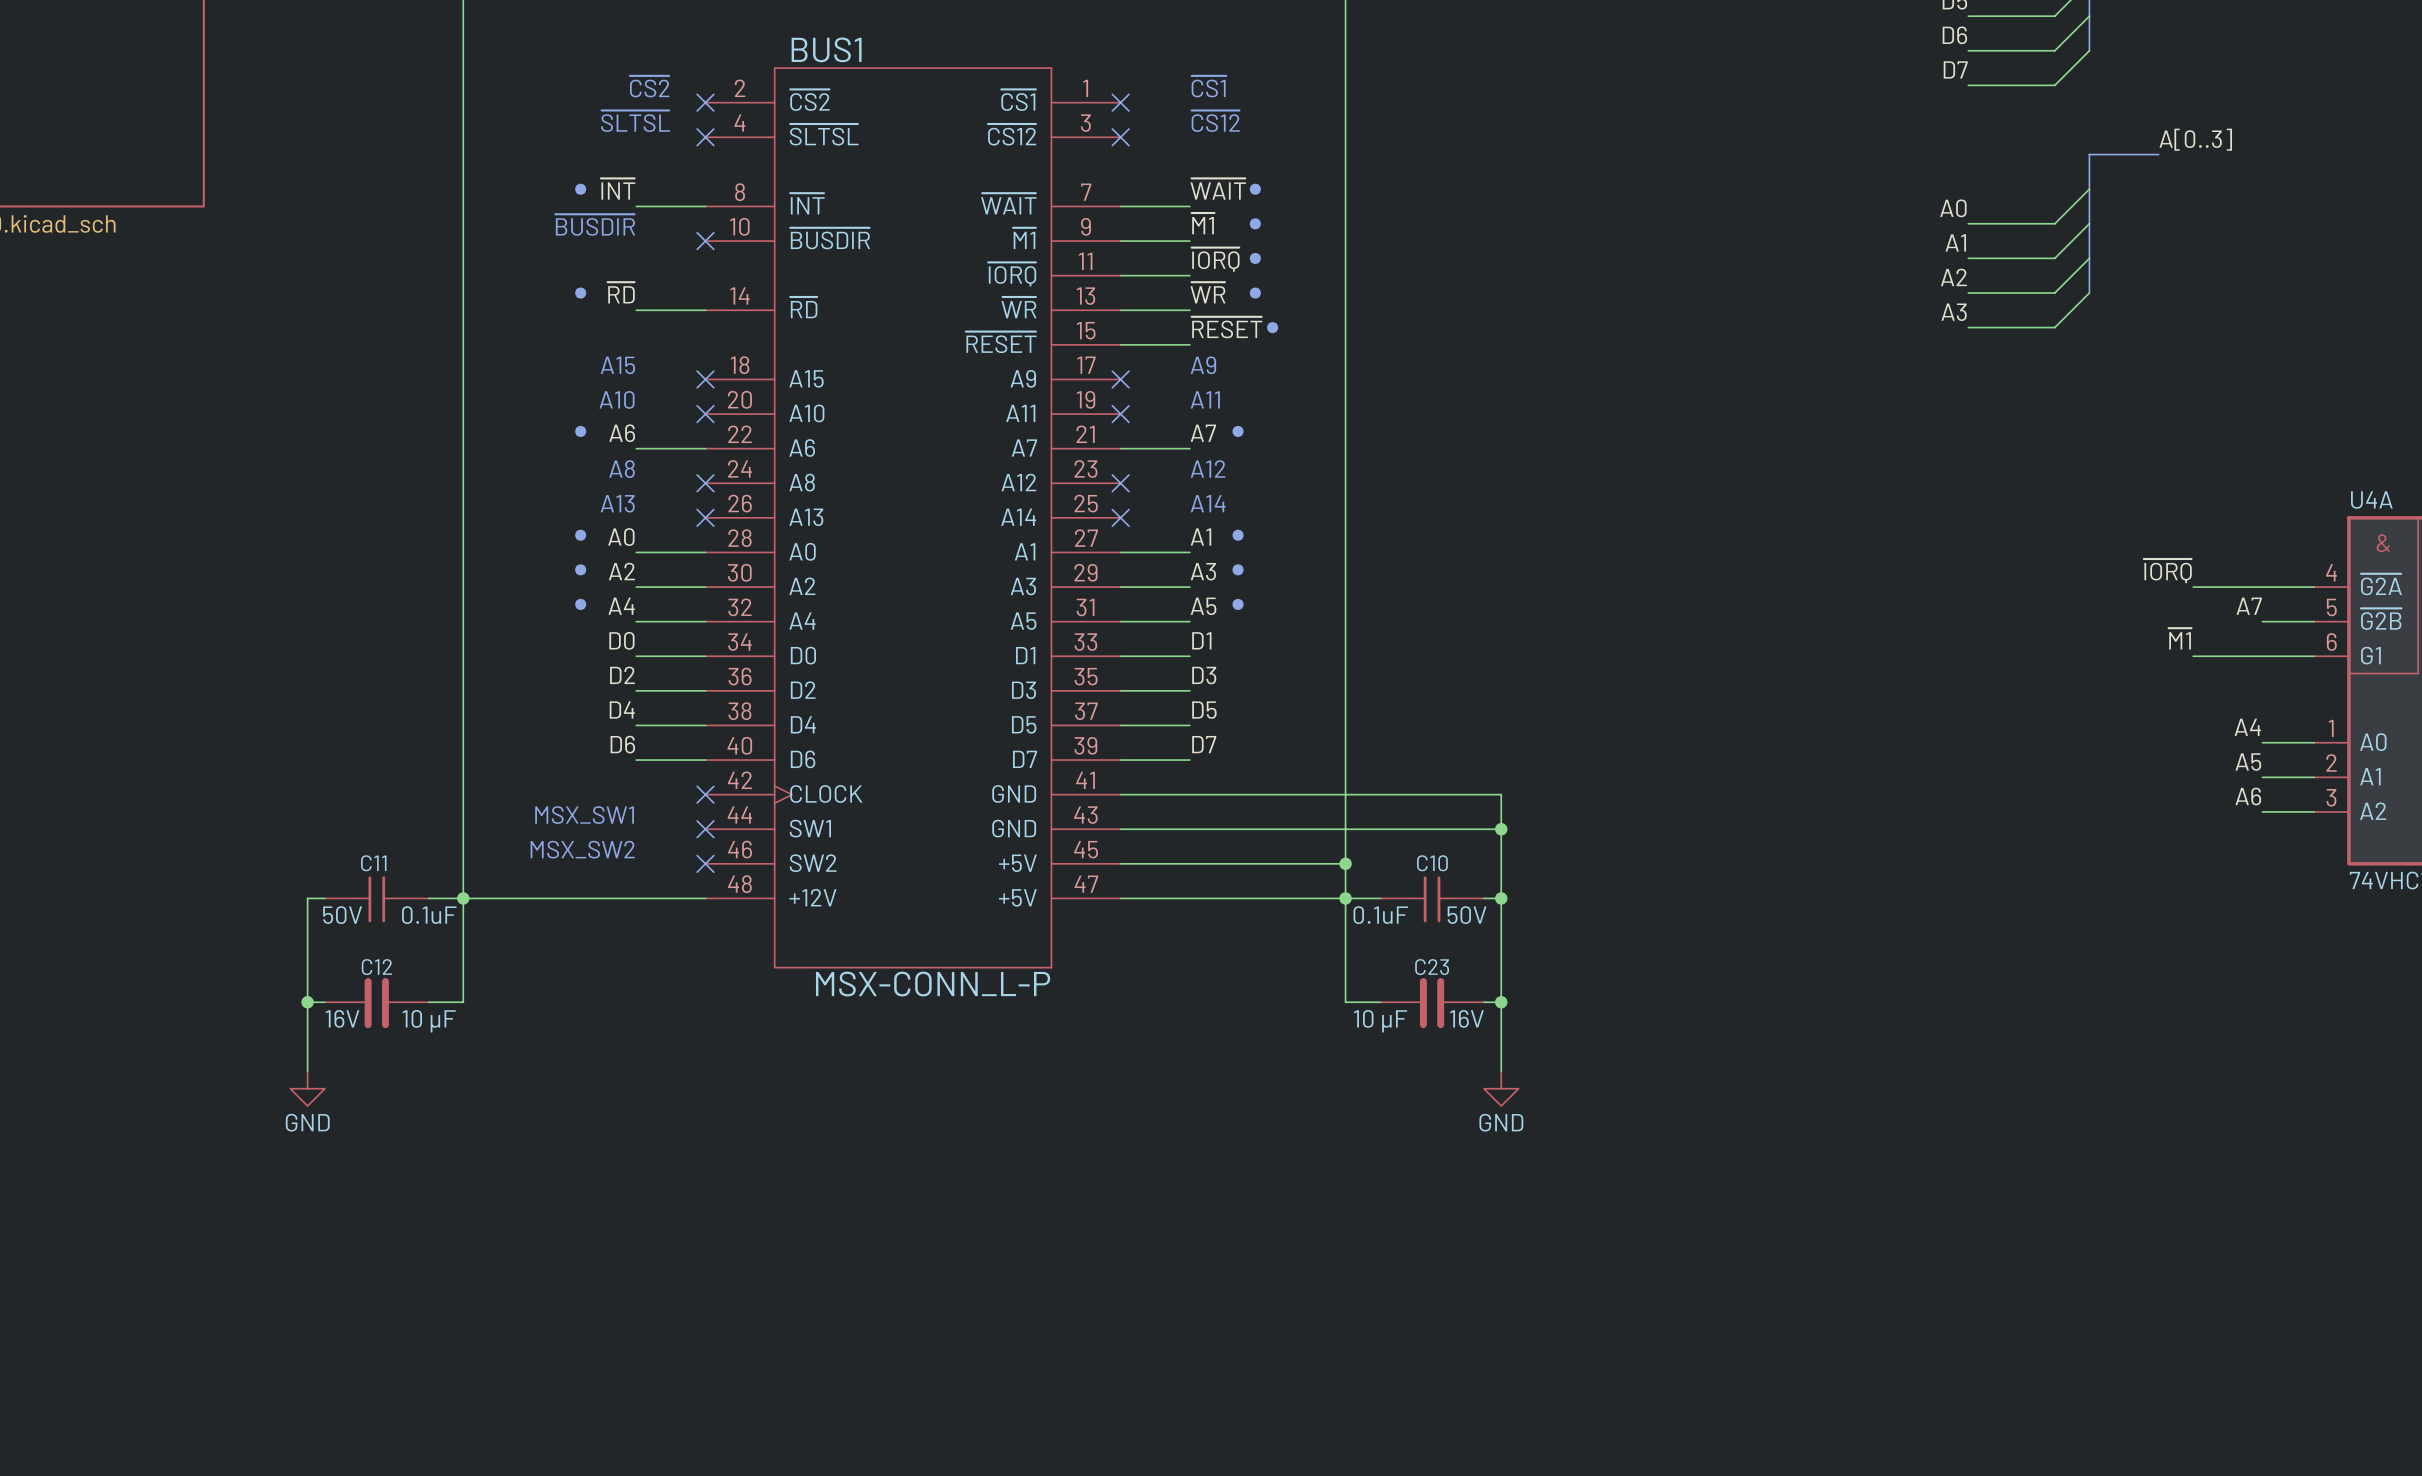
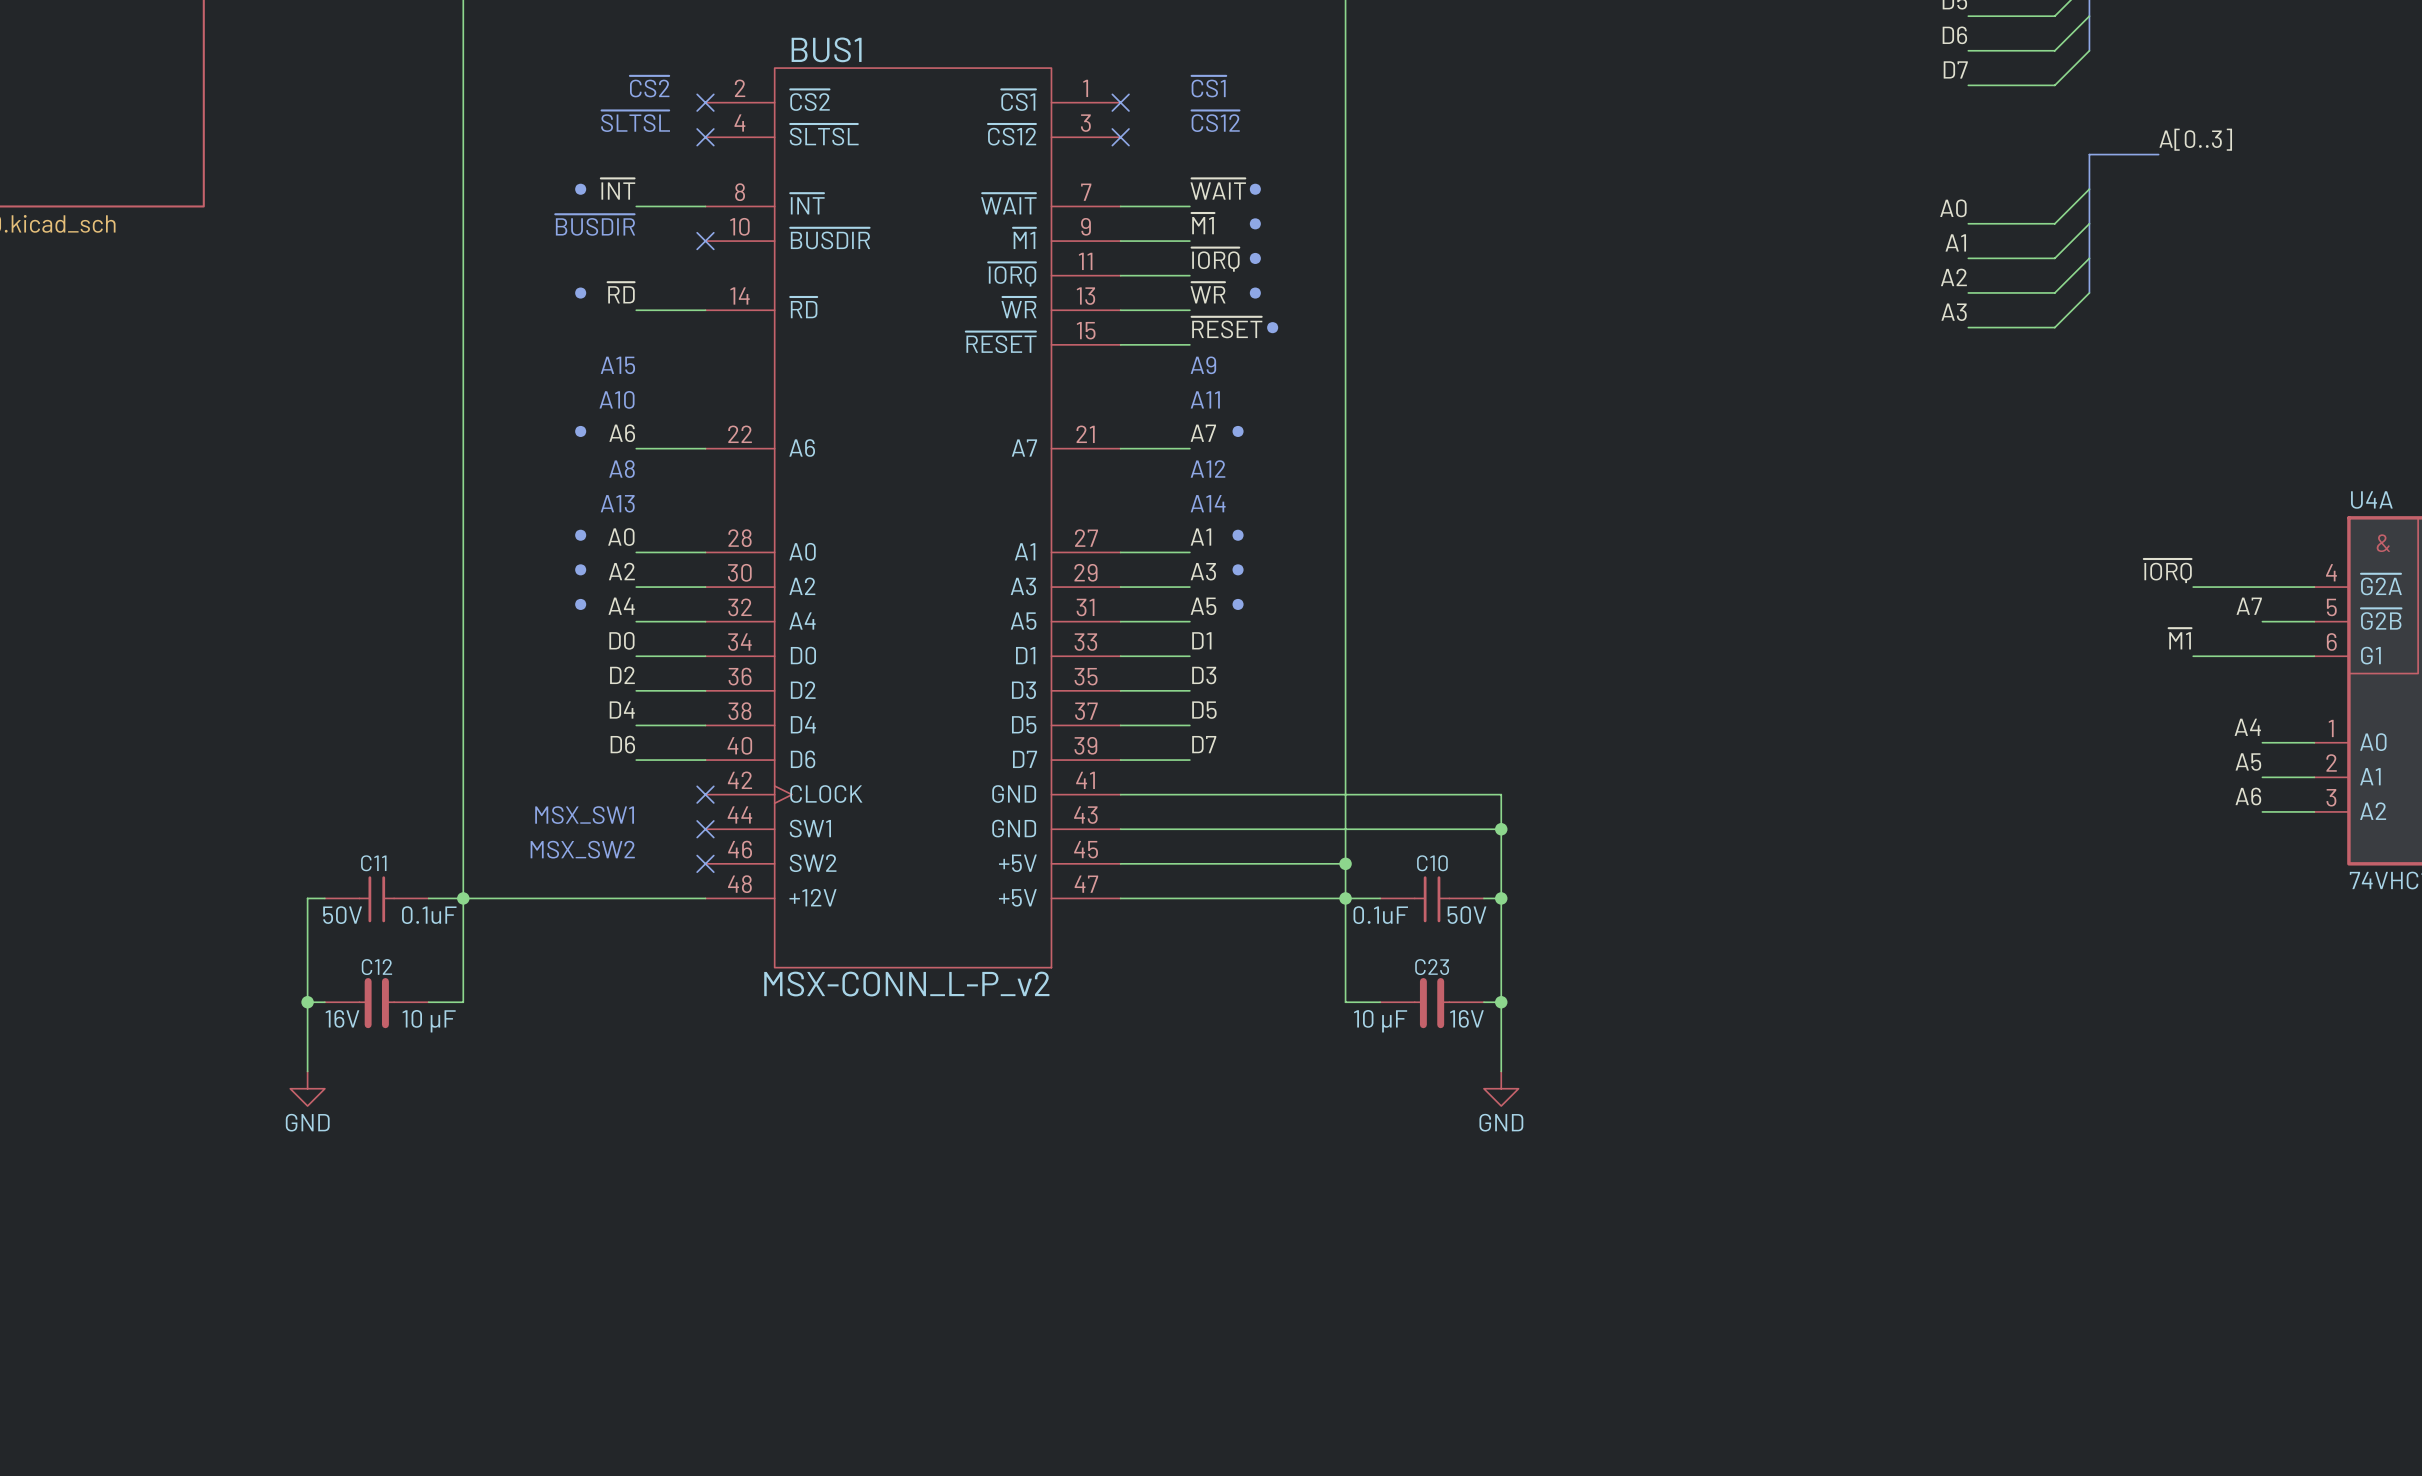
BUS1 symbol: [705, 68, 1121, 968] -> [705, 68, 1121, 968]
no-connect mark: (705, 379) -> none
no-connect mark: (1120, 379) -> none
no-connect mark: (705, 414) -> none
no-connect mark: (1120, 414) -> none
no-connect mark: (705, 483) -> none
no-connect mark: (1120, 483) -> none
no-connect mark: (705, 517) -> none
no-connect mark: (1120, 517) -> none
BUS1 value: MSX-CONN_L-P (933, 984) -> MSX-CONN_L-P_v2 (906, 984)

